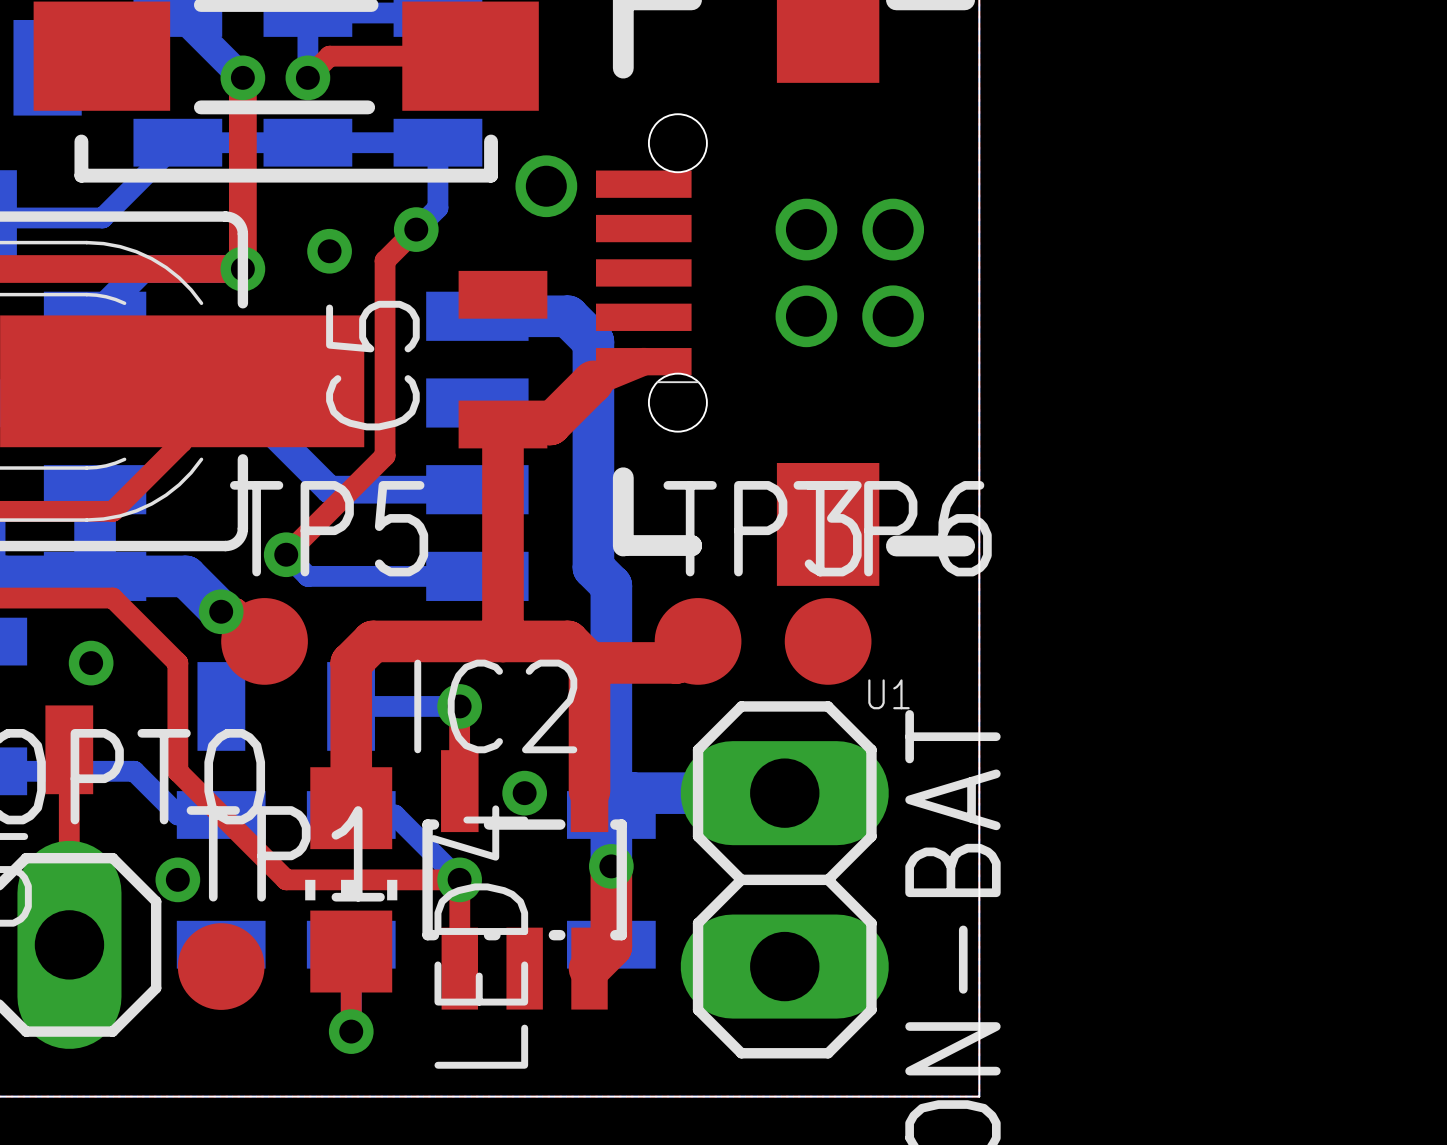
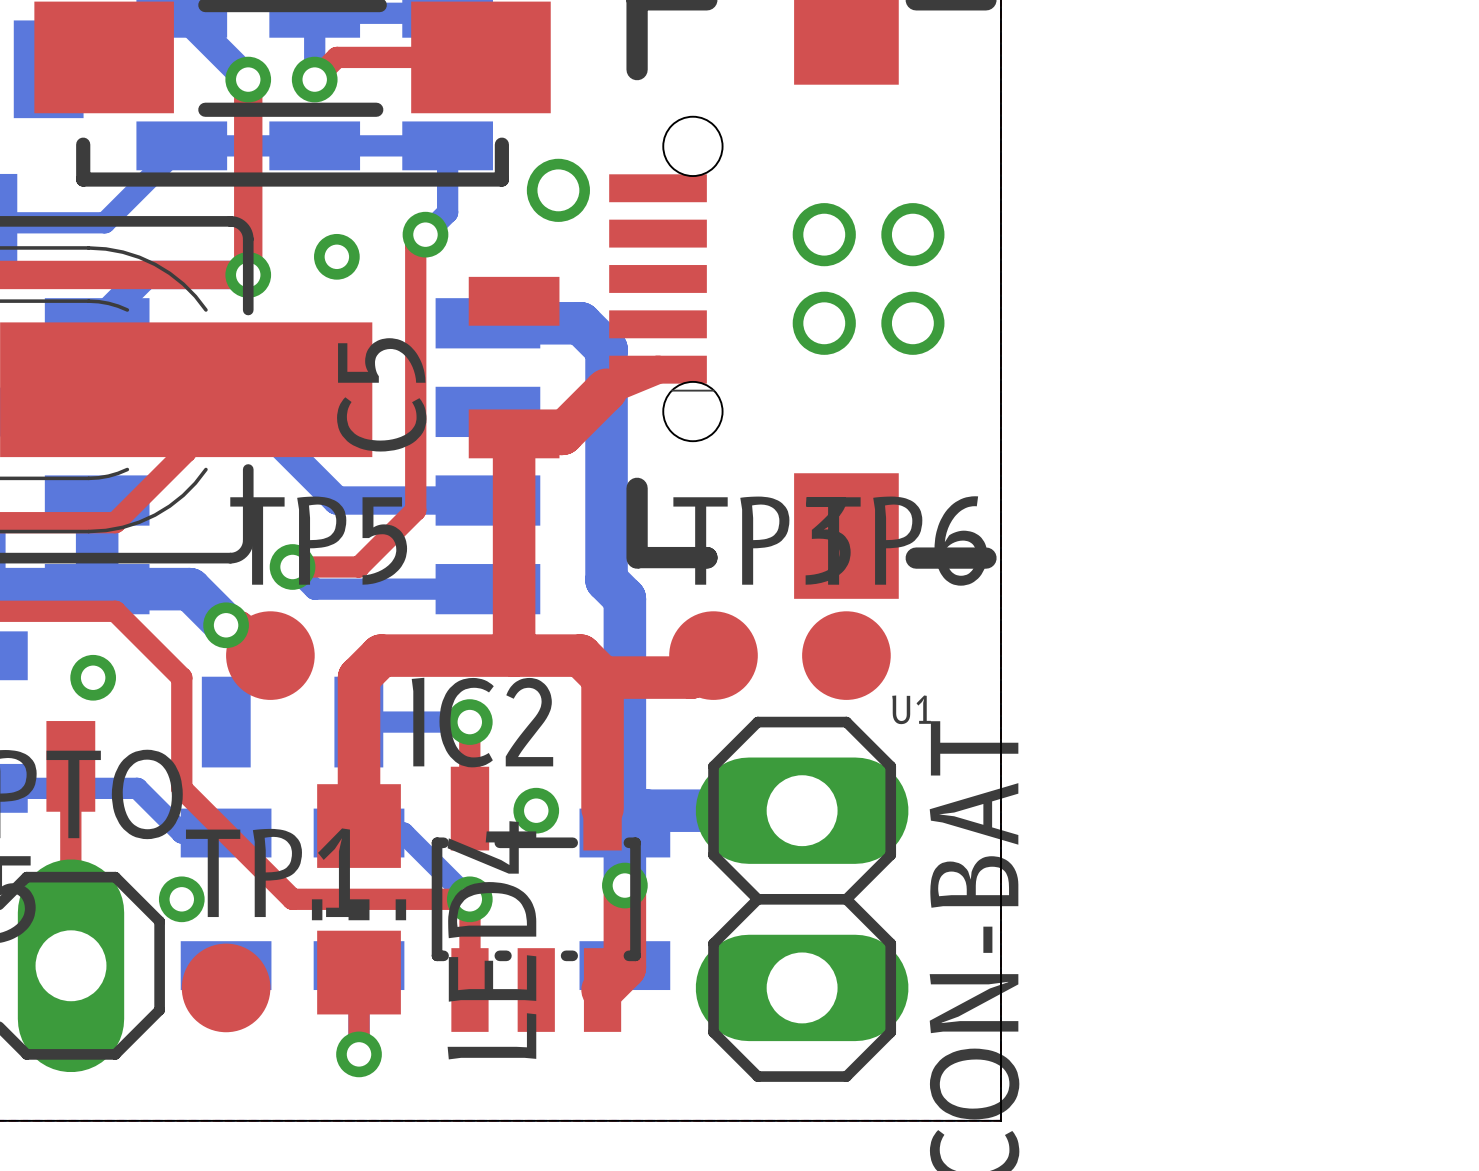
top track: (406, 239) (385, 260) (385, 455) (286, 554) -> (415, 244) (415, 510) (359, 566) (292, 566)

